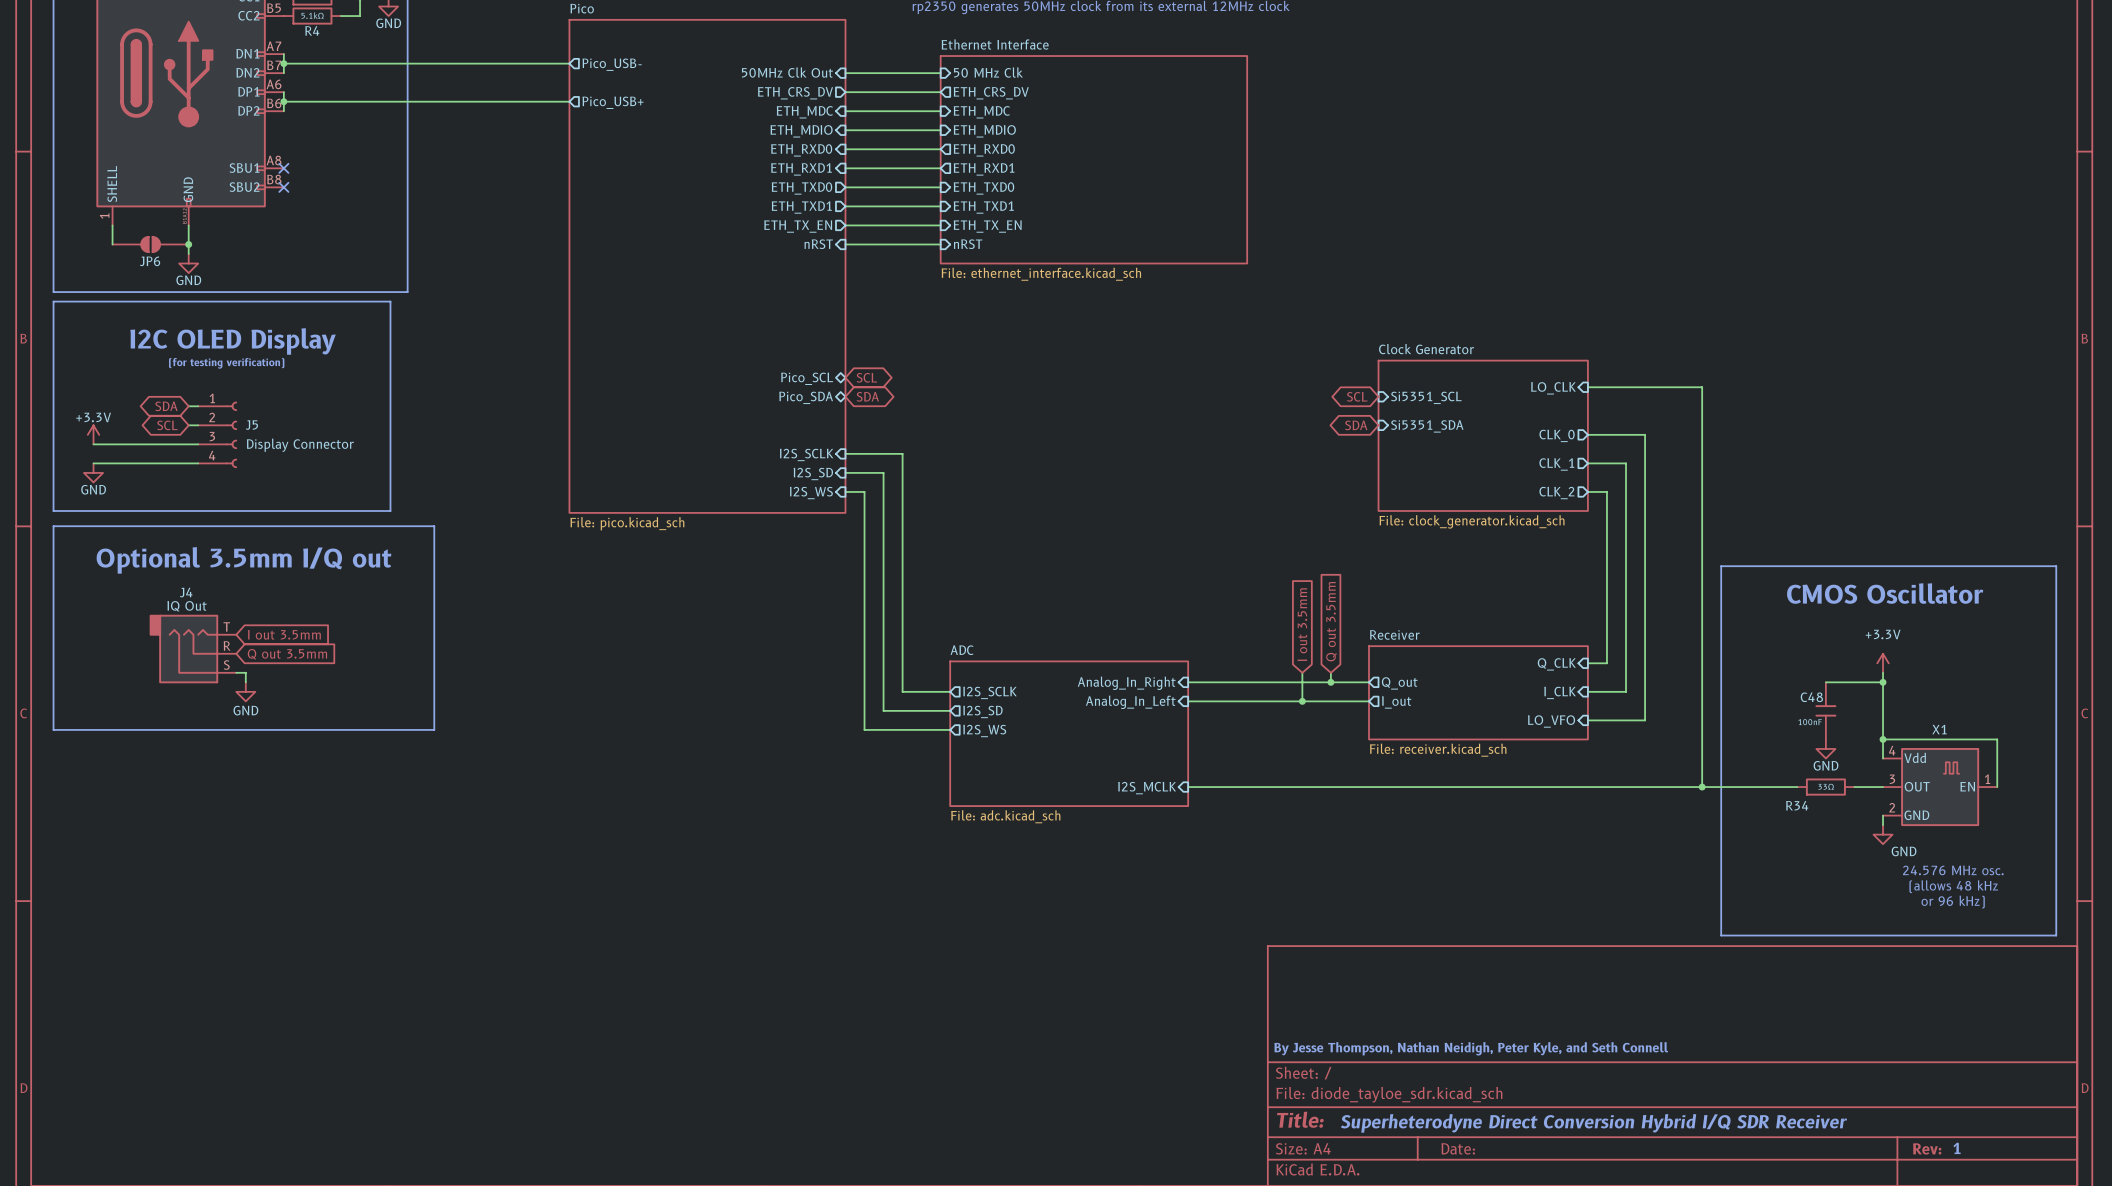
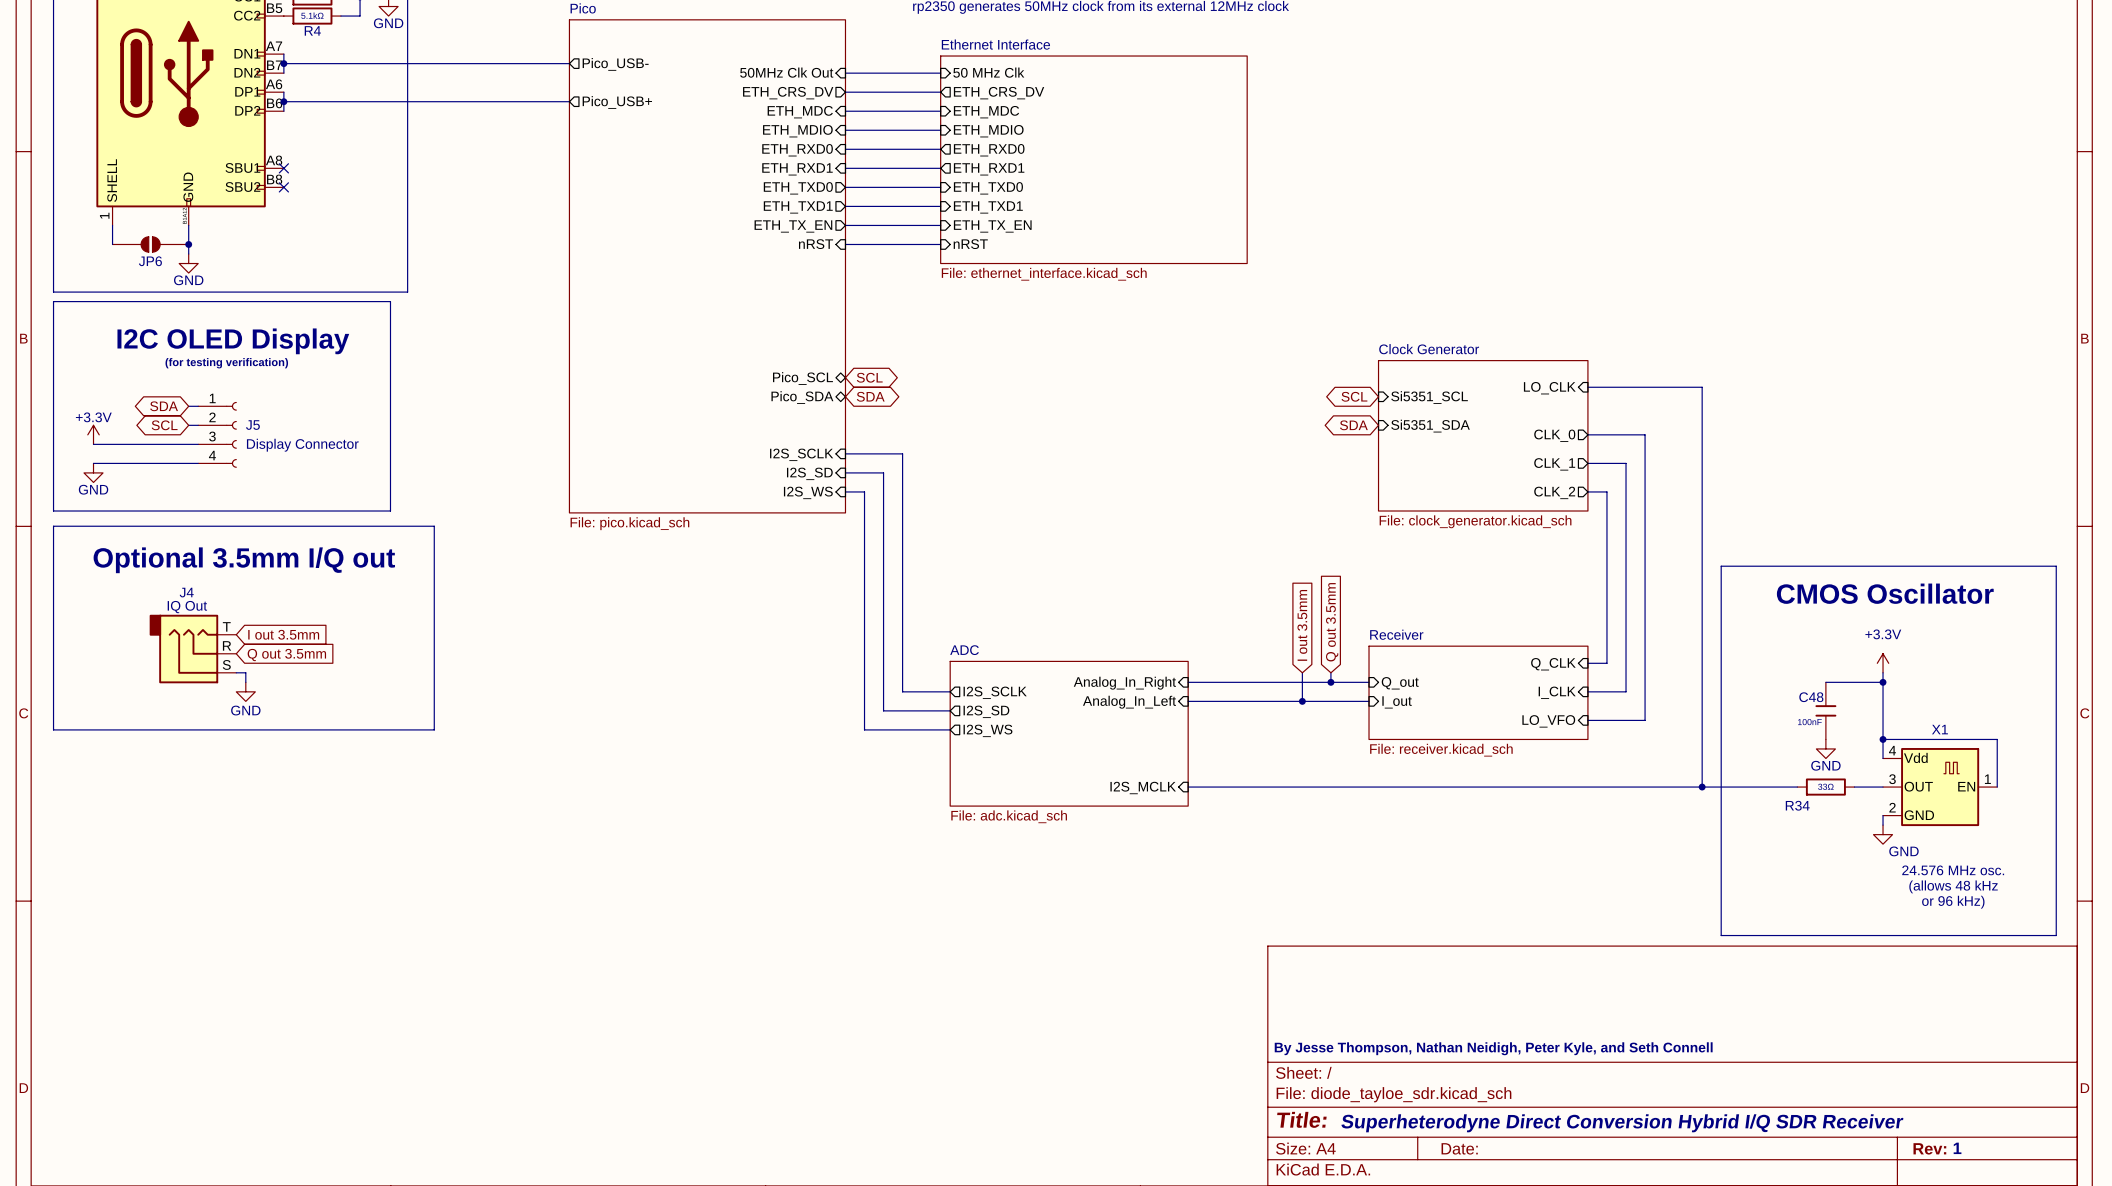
sheet pin shape: output (1399, 683) -> input (1400, 683)
sheet pin shape: output (1396, 702) -> input (1397, 702)

